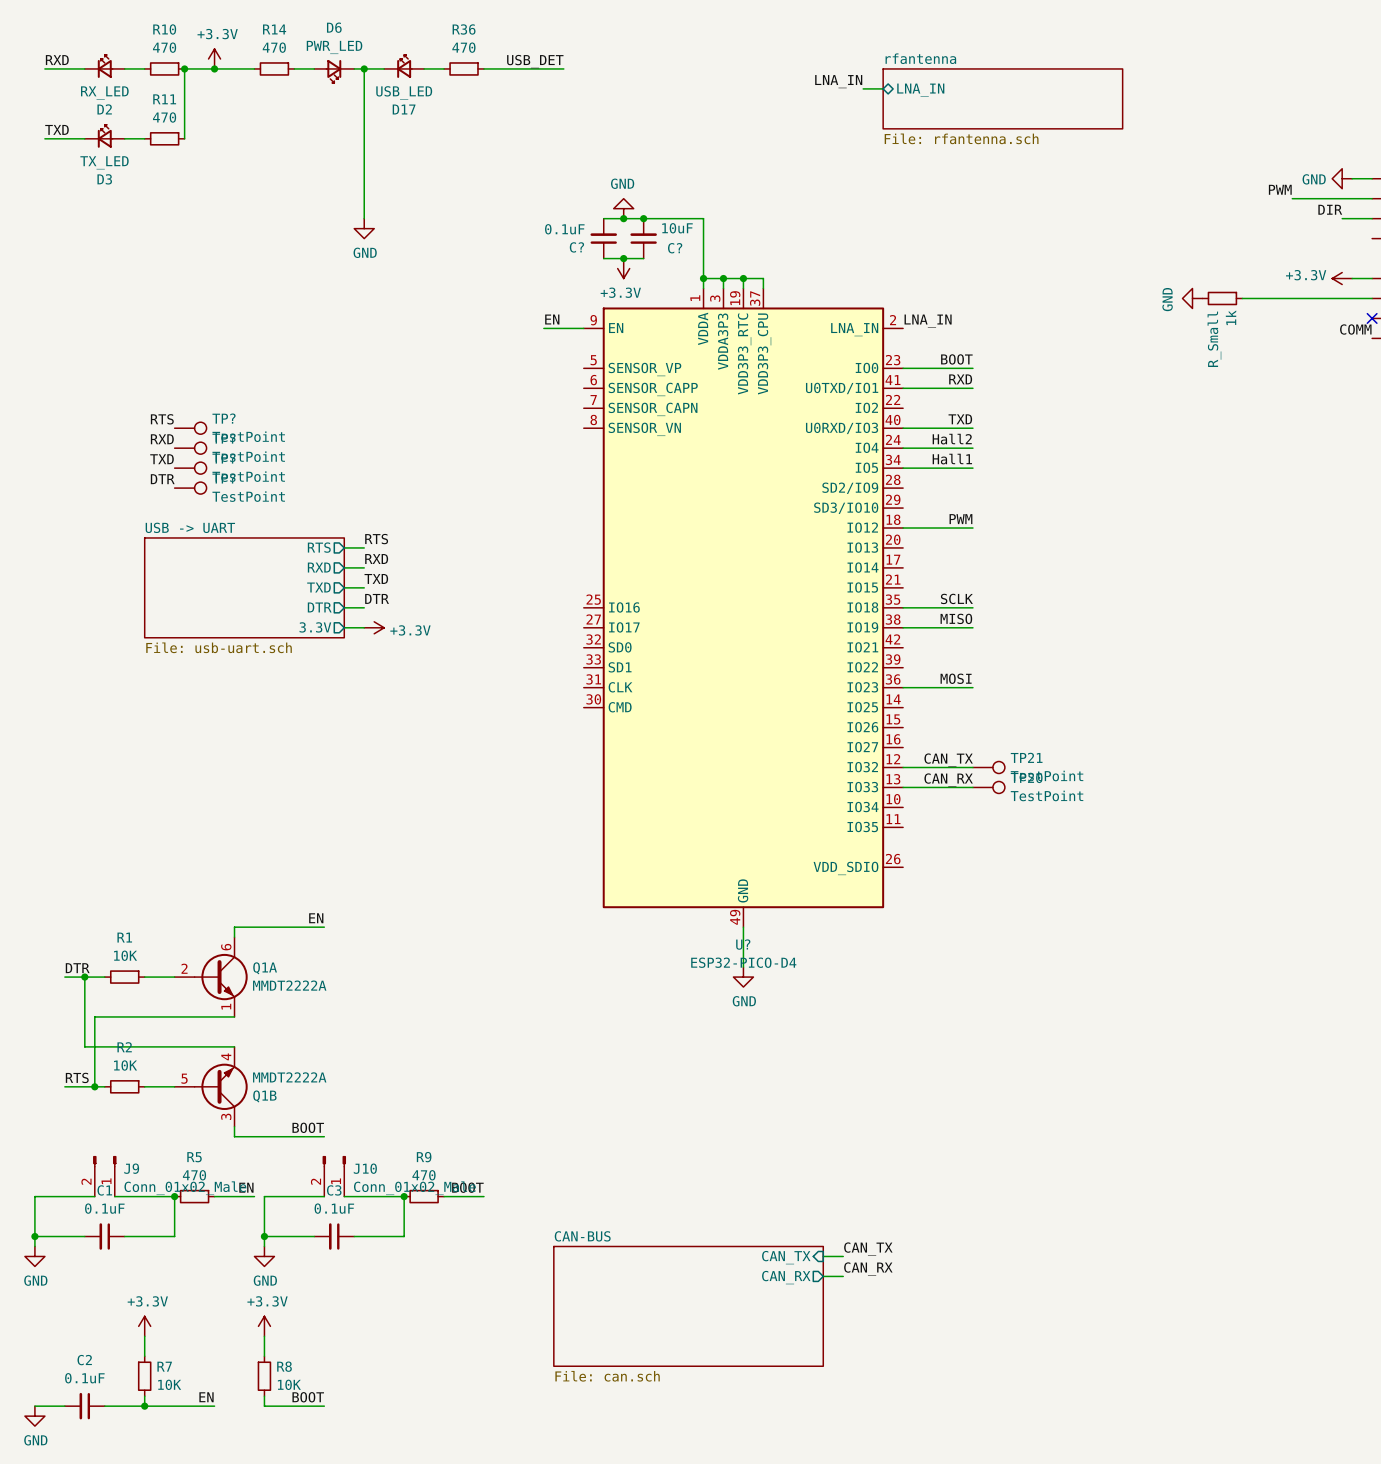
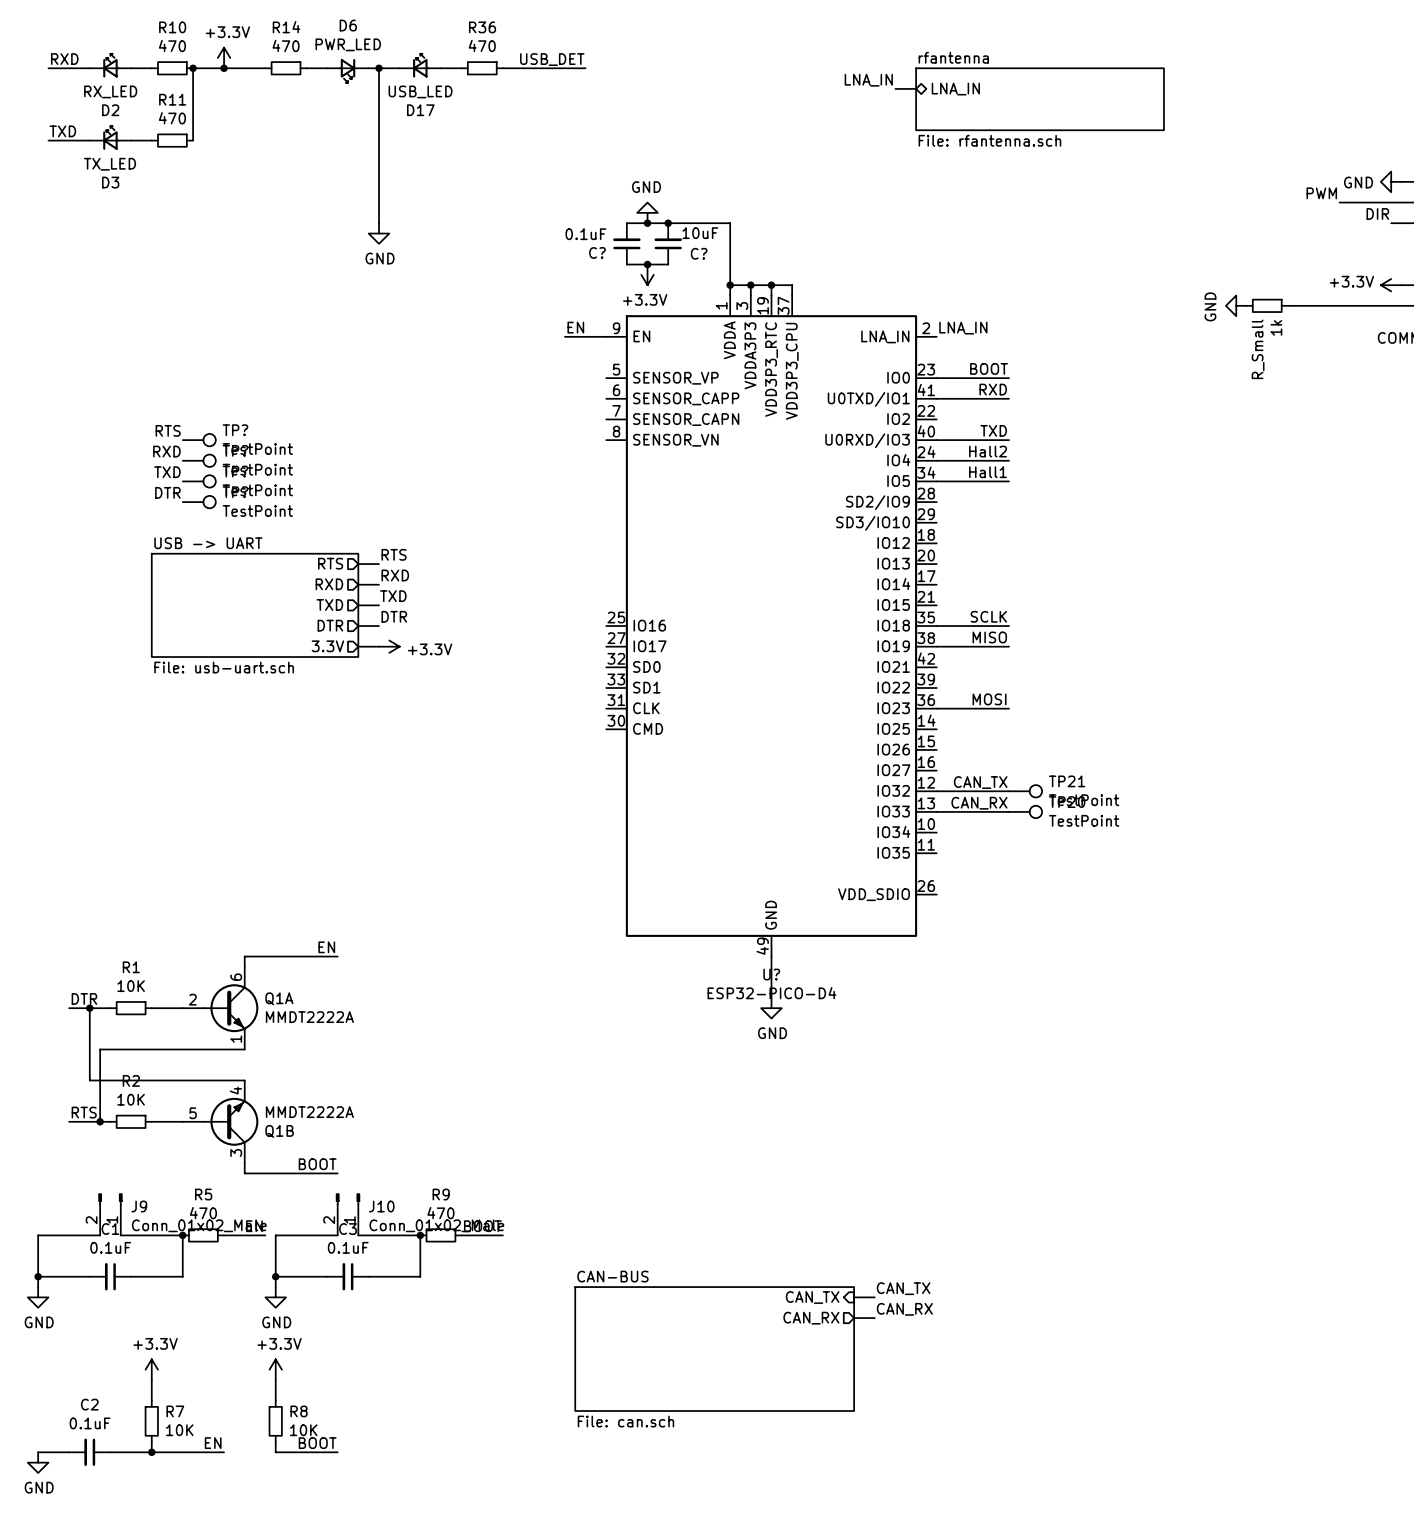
label: PWM (960, 519) -> none
wire: (903, 528) (972, 528) -> none

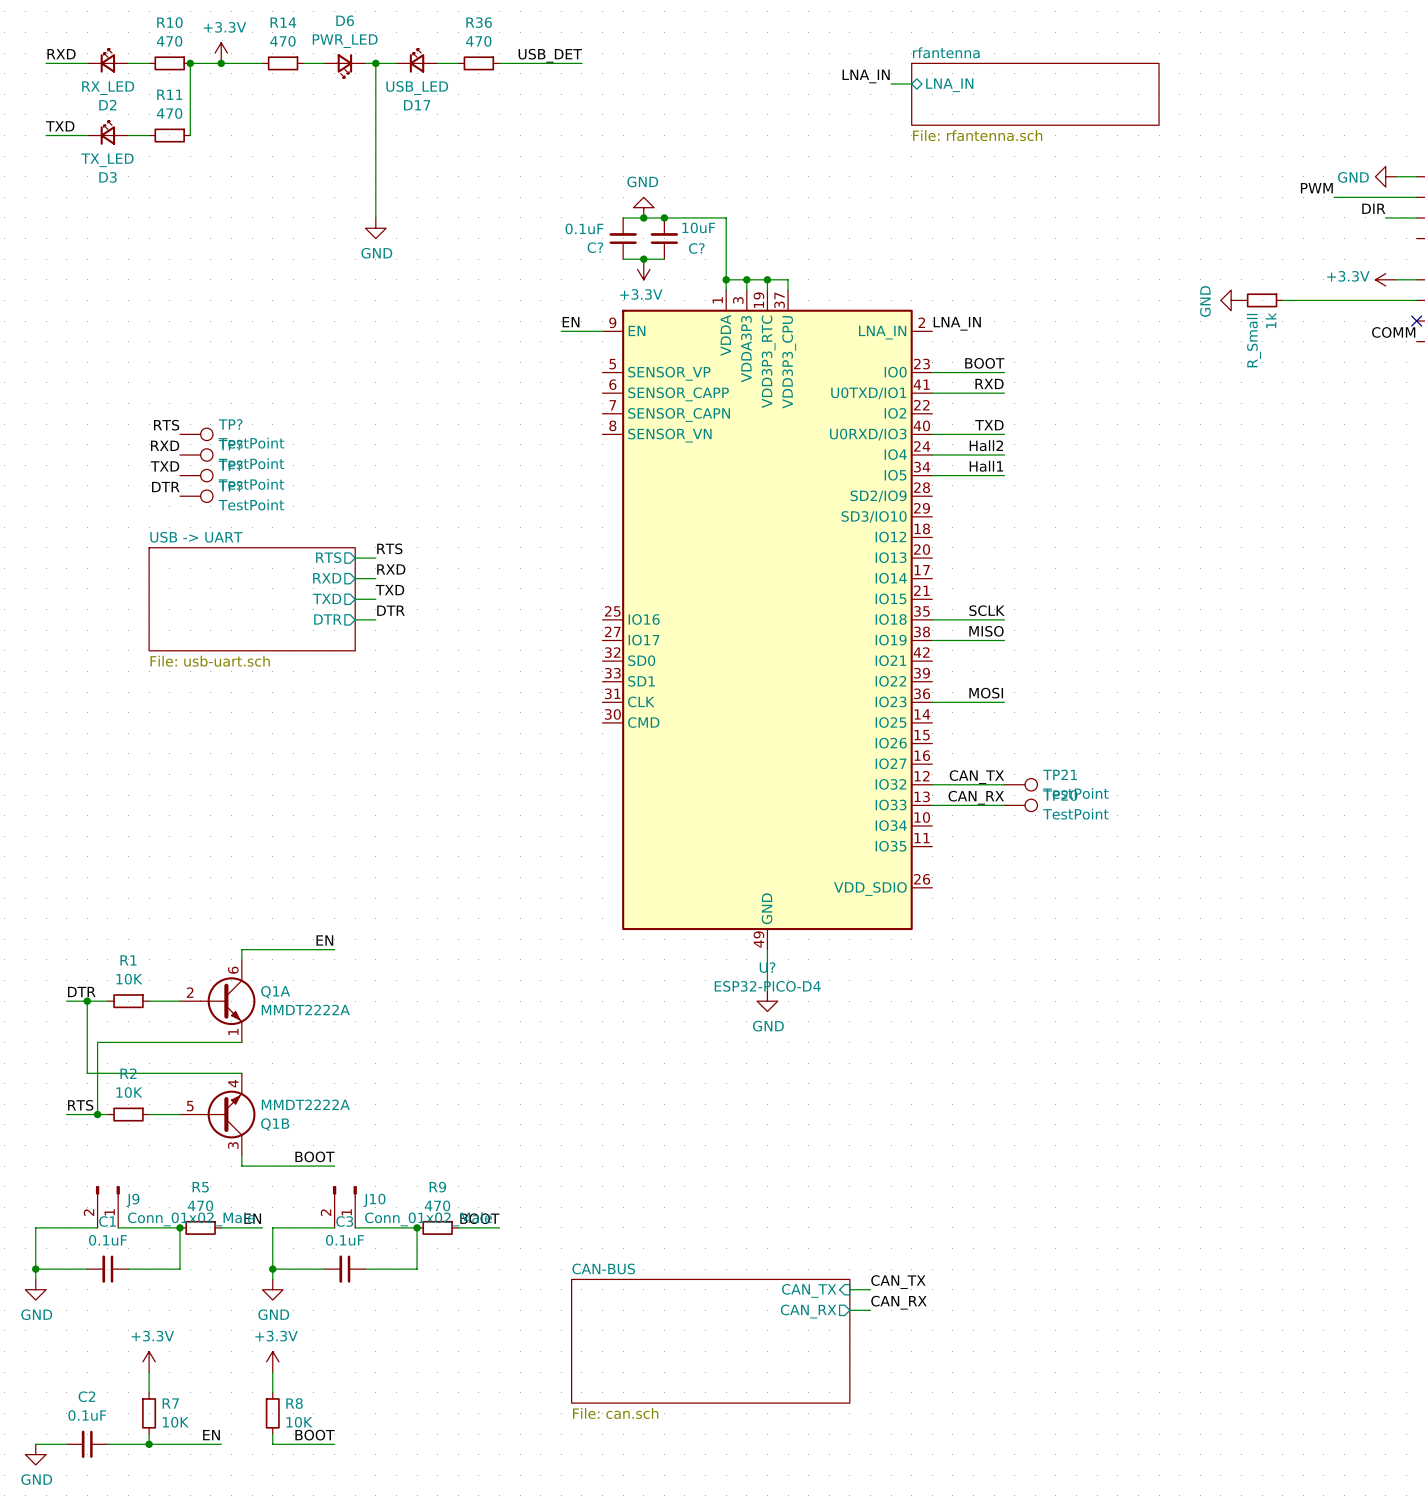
sheet pin: 3.3V (327, 646) -> none
wire: (358, 646) (378, 646) -> none
power symbol: +3.3V (389, 646) -> none

